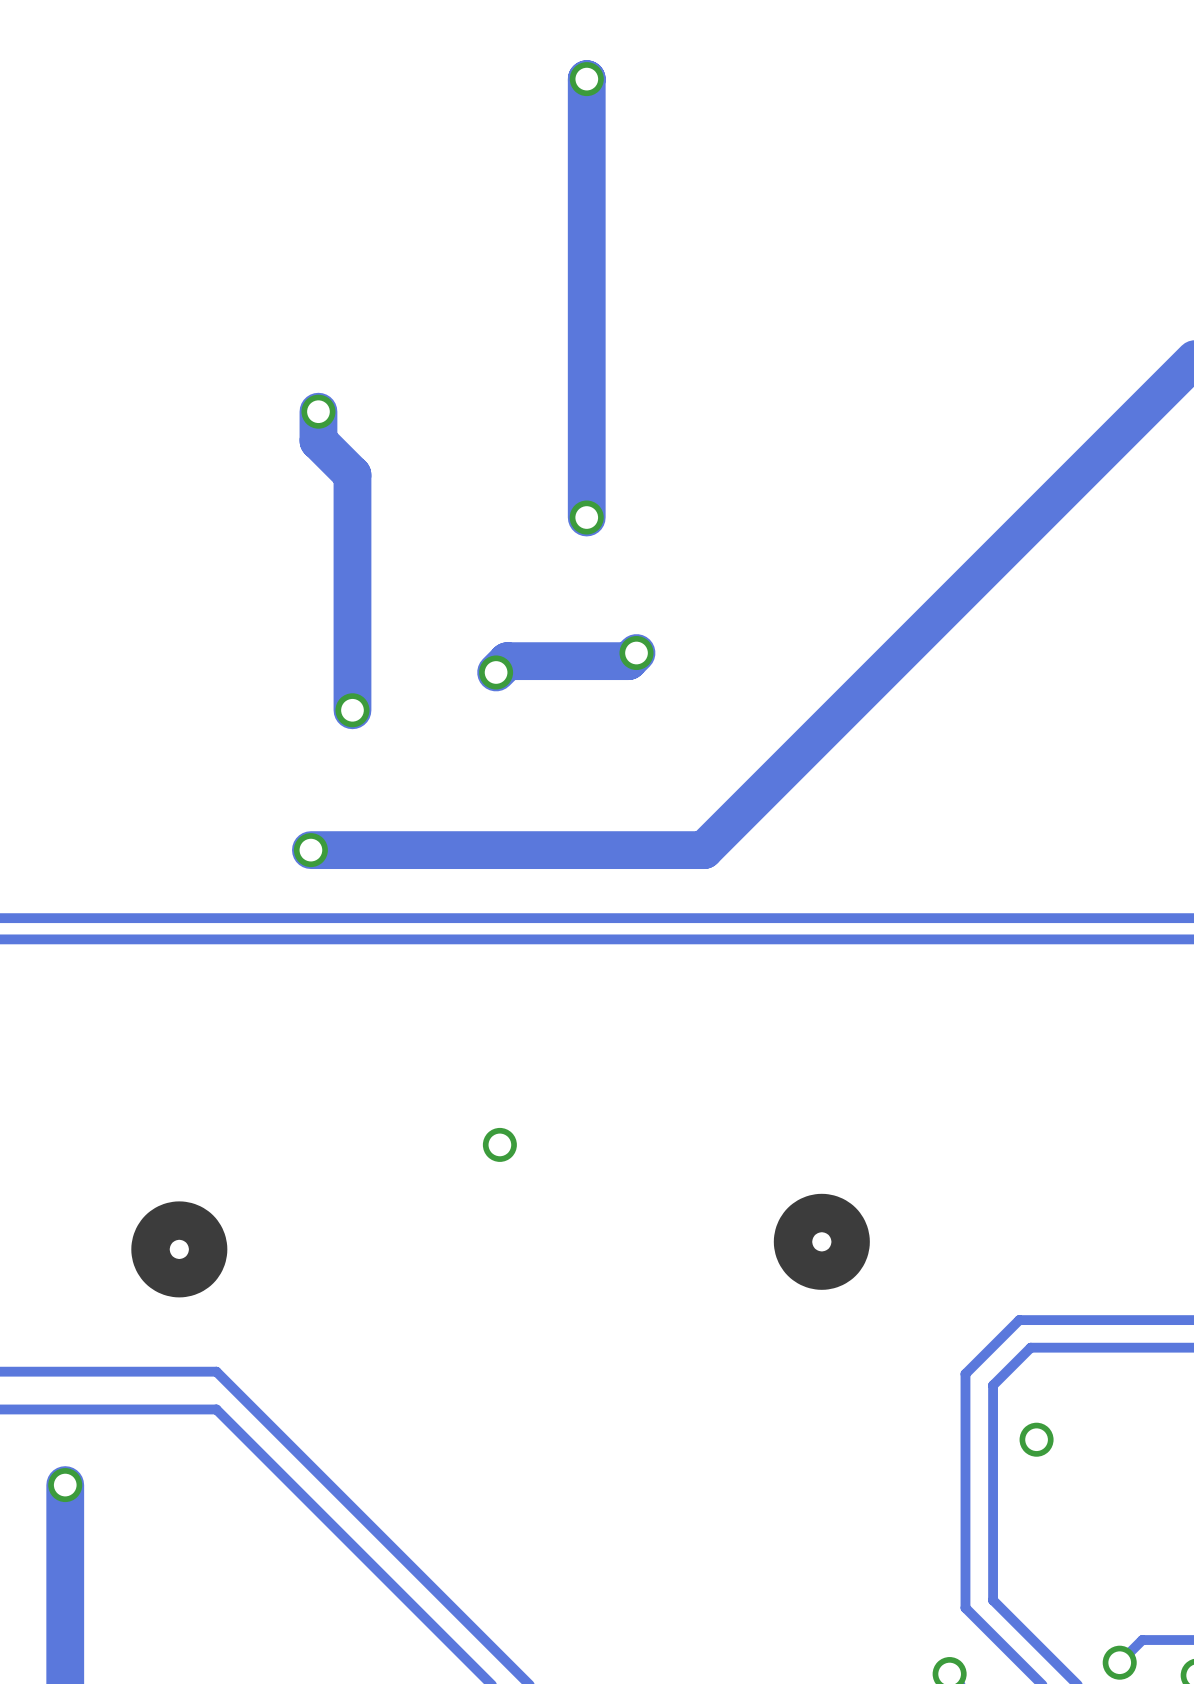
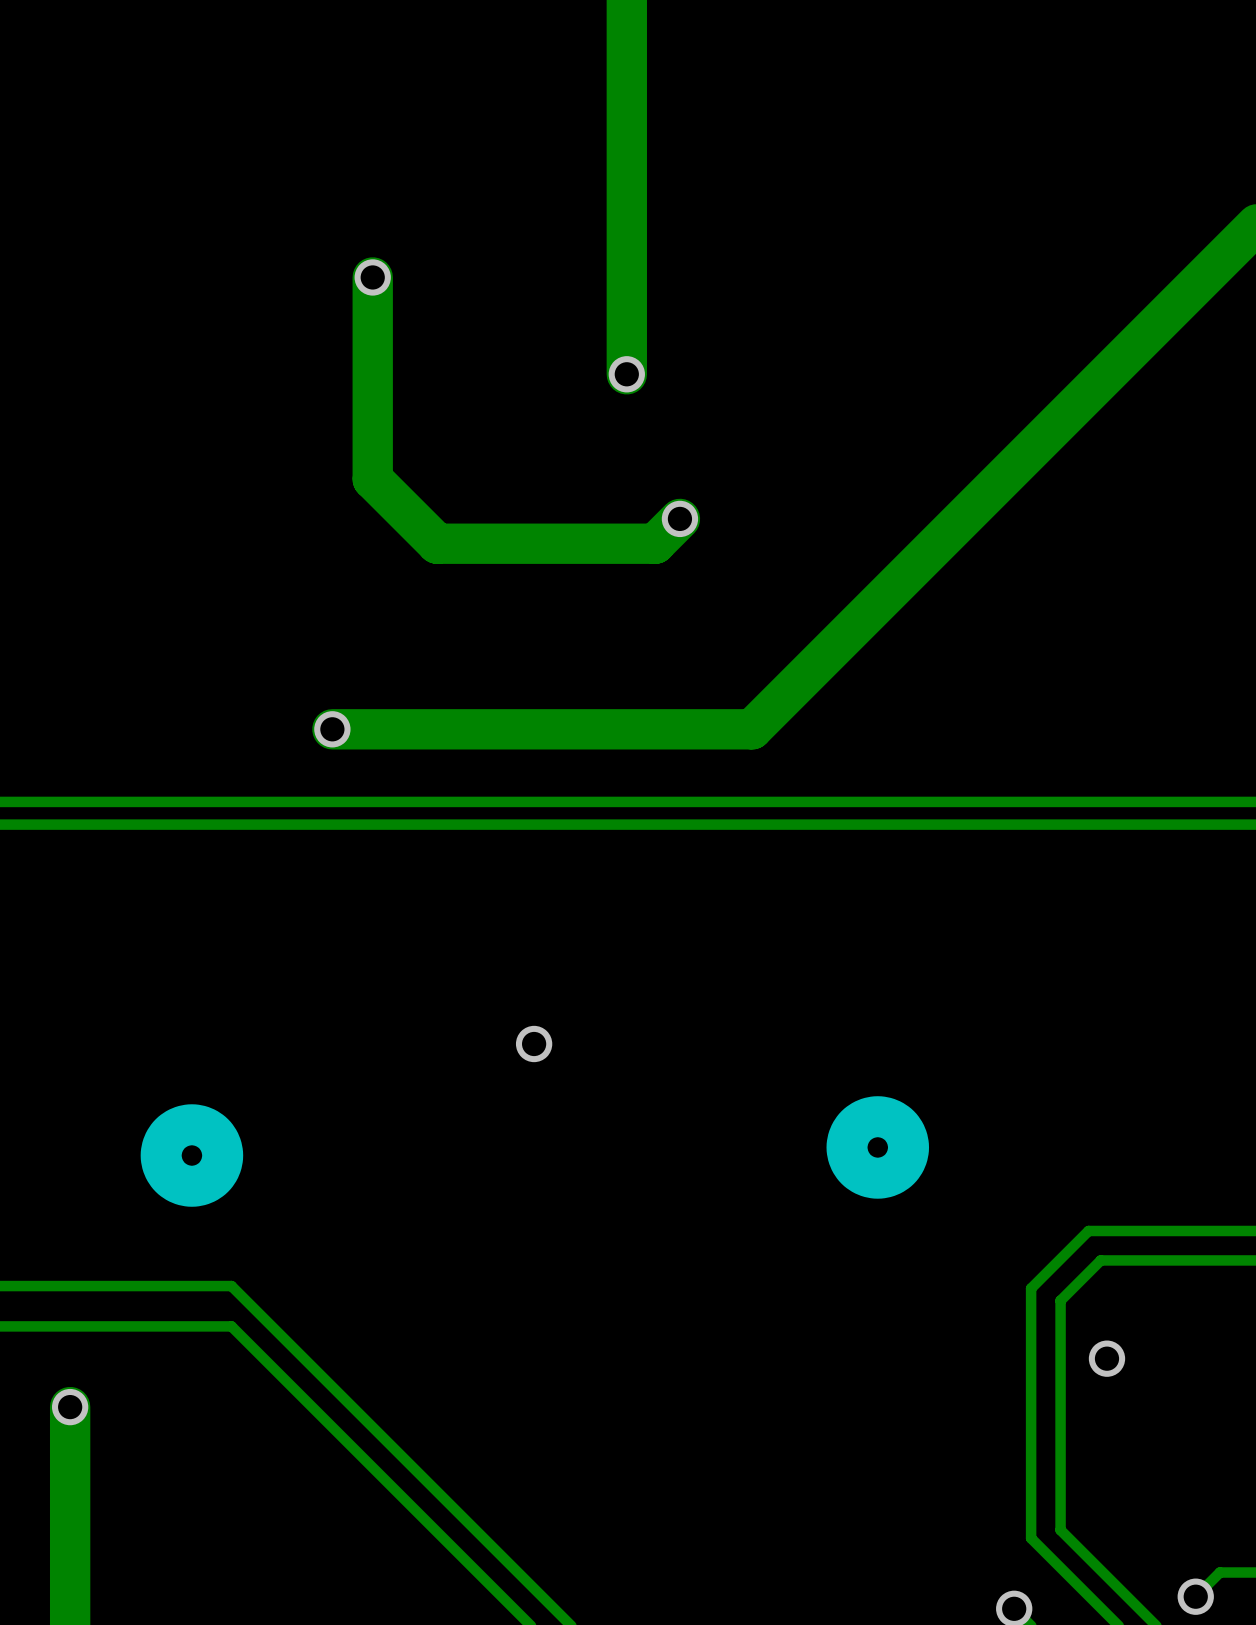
track: (318, 411) (318, 440) (352, 474) (352, 710) -> none
via position: (318, 411) -> (372, 277)
track: (628, 661) (507, 661) (496, 672) -> (671, 527) (655, 543) (437, 543) (372, 479) (372, 277)
via: (496, 672) -> none
via: (352, 710) -> none

